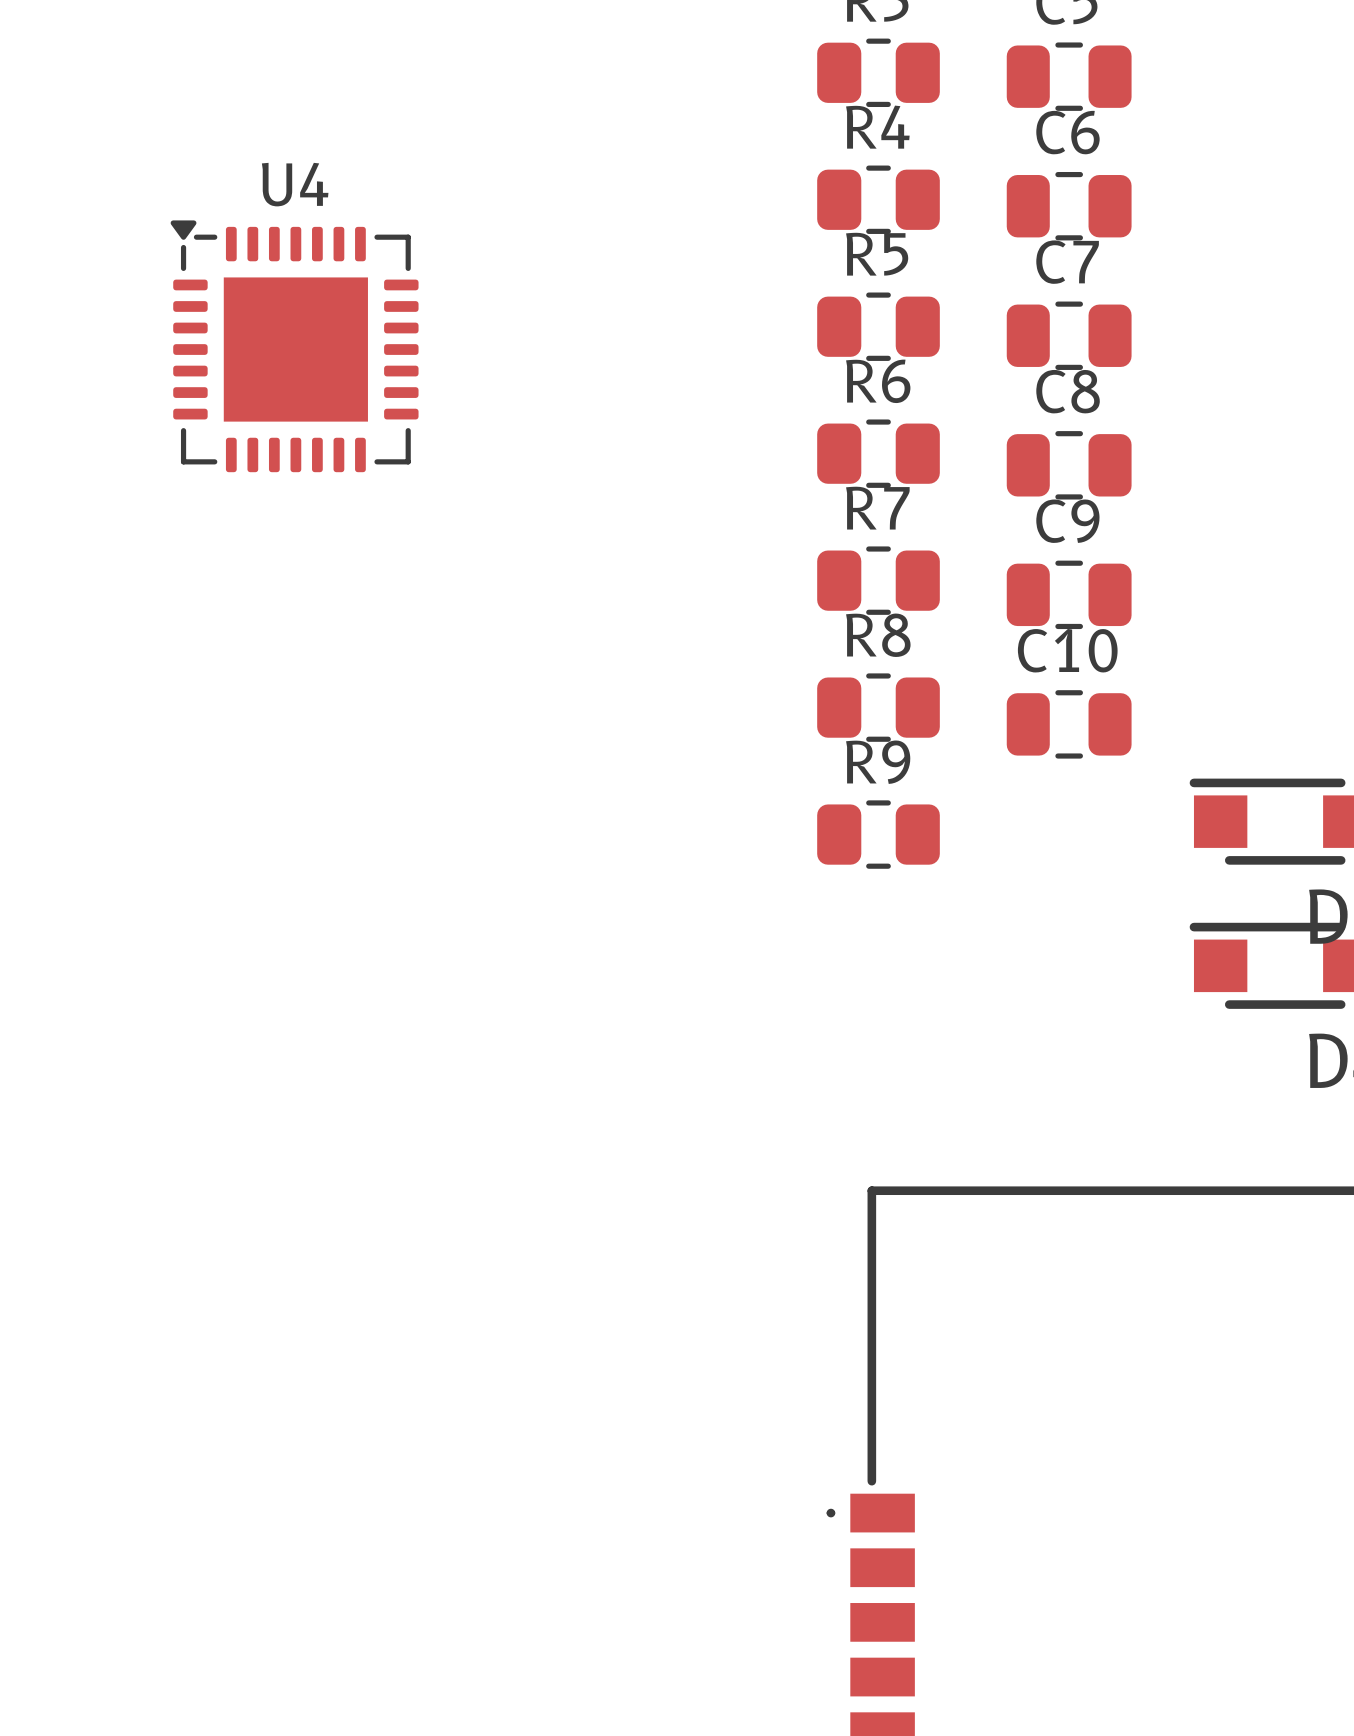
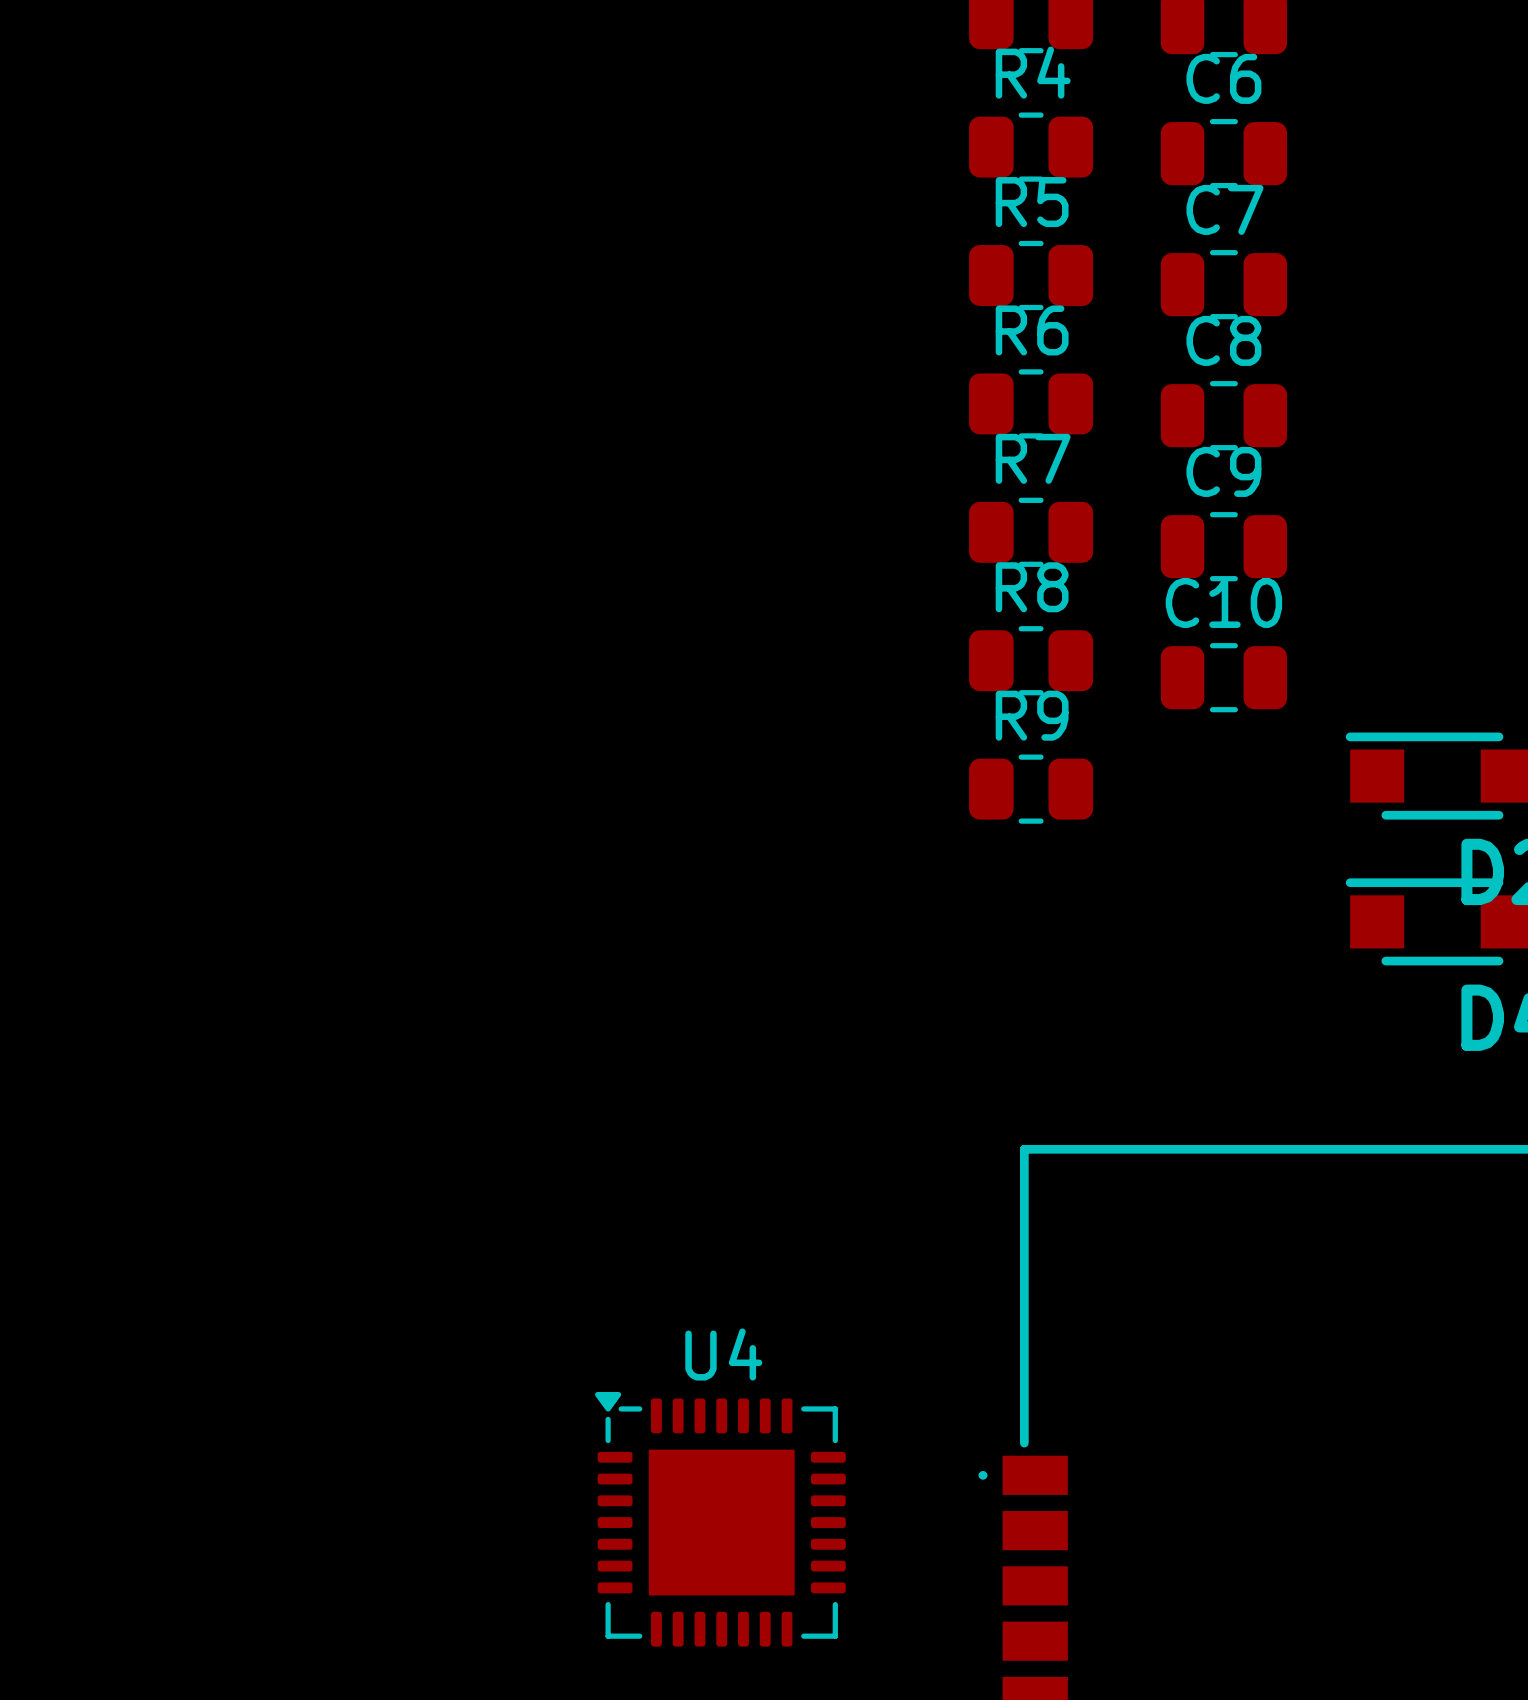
U4 position: (294, 346) -> (720, 1519)

